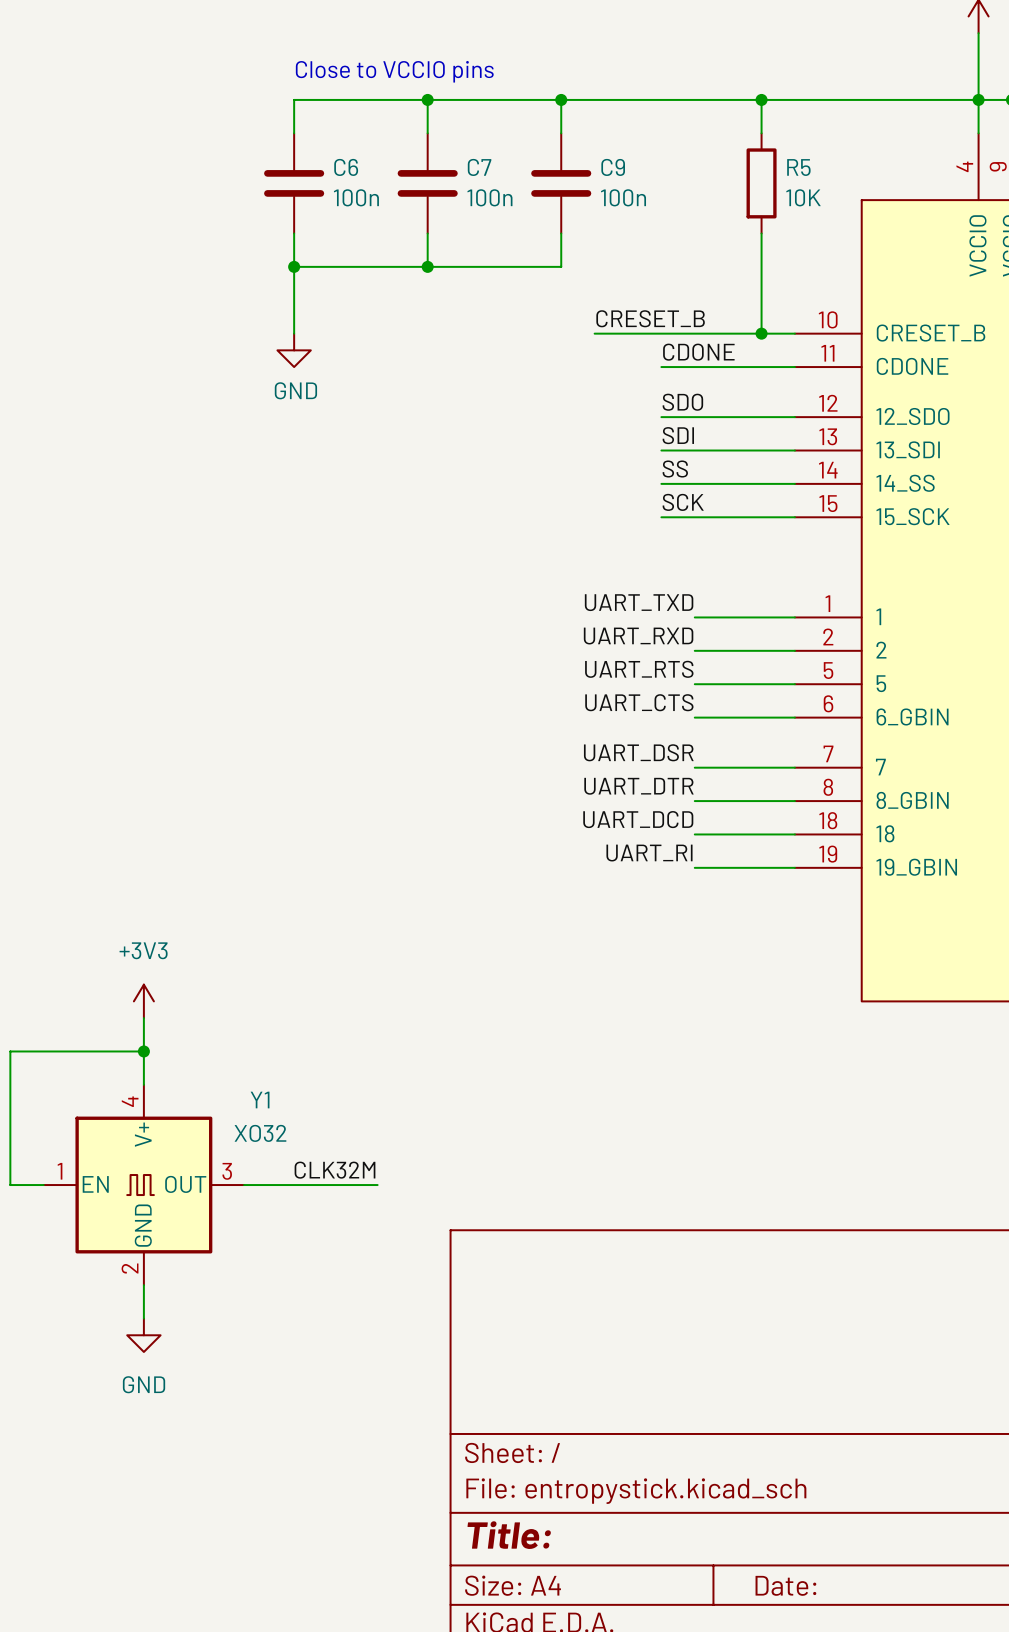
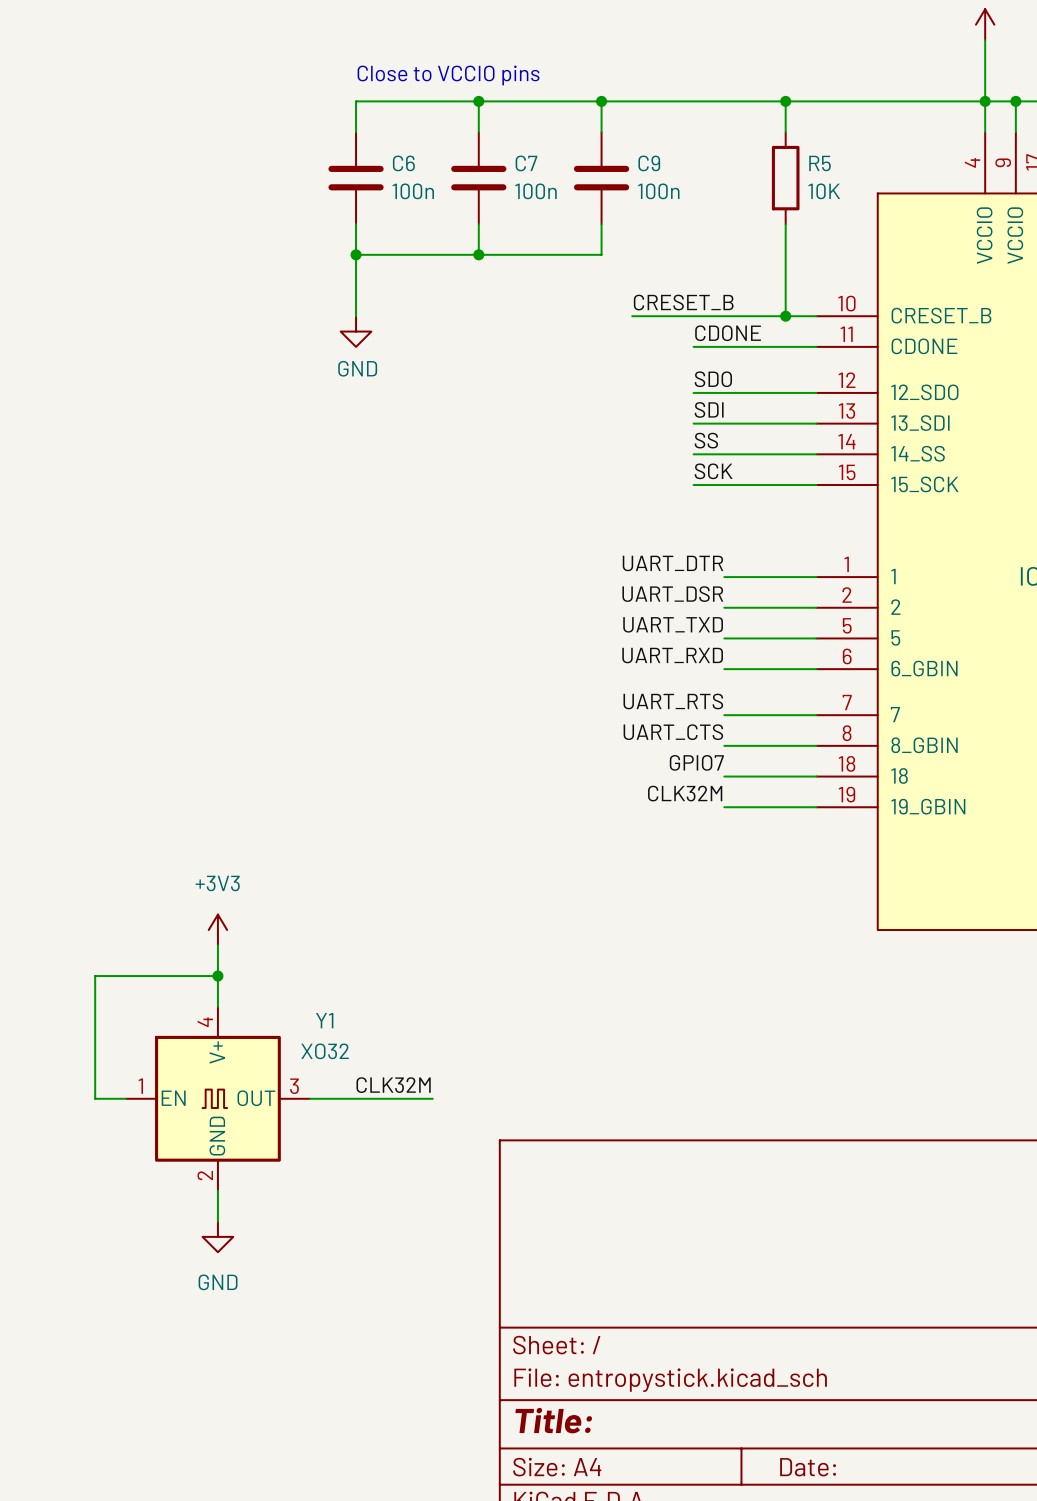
label: UART_TXD (639, 602) -> UART_DTR (672, 563)
label: UART_RXD (638, 636) -> UART_DSR (672, 594)
label: UART_RTS (639, 669) -> UART_TXD (673, 624)
label: UART_CTS (639, 702) -> UART_RXD (672, 655)
label: UART_DSR (638, 752) -> UART_RTS (673, 701)
label: UART_DTR (638, 786) -> UART_CTS (673, 732)
label: UART_DCD (638, 819) -> GPIO7 (696, 762)
label: UART_RI (649, 853) -> CLK32M (685, 793)

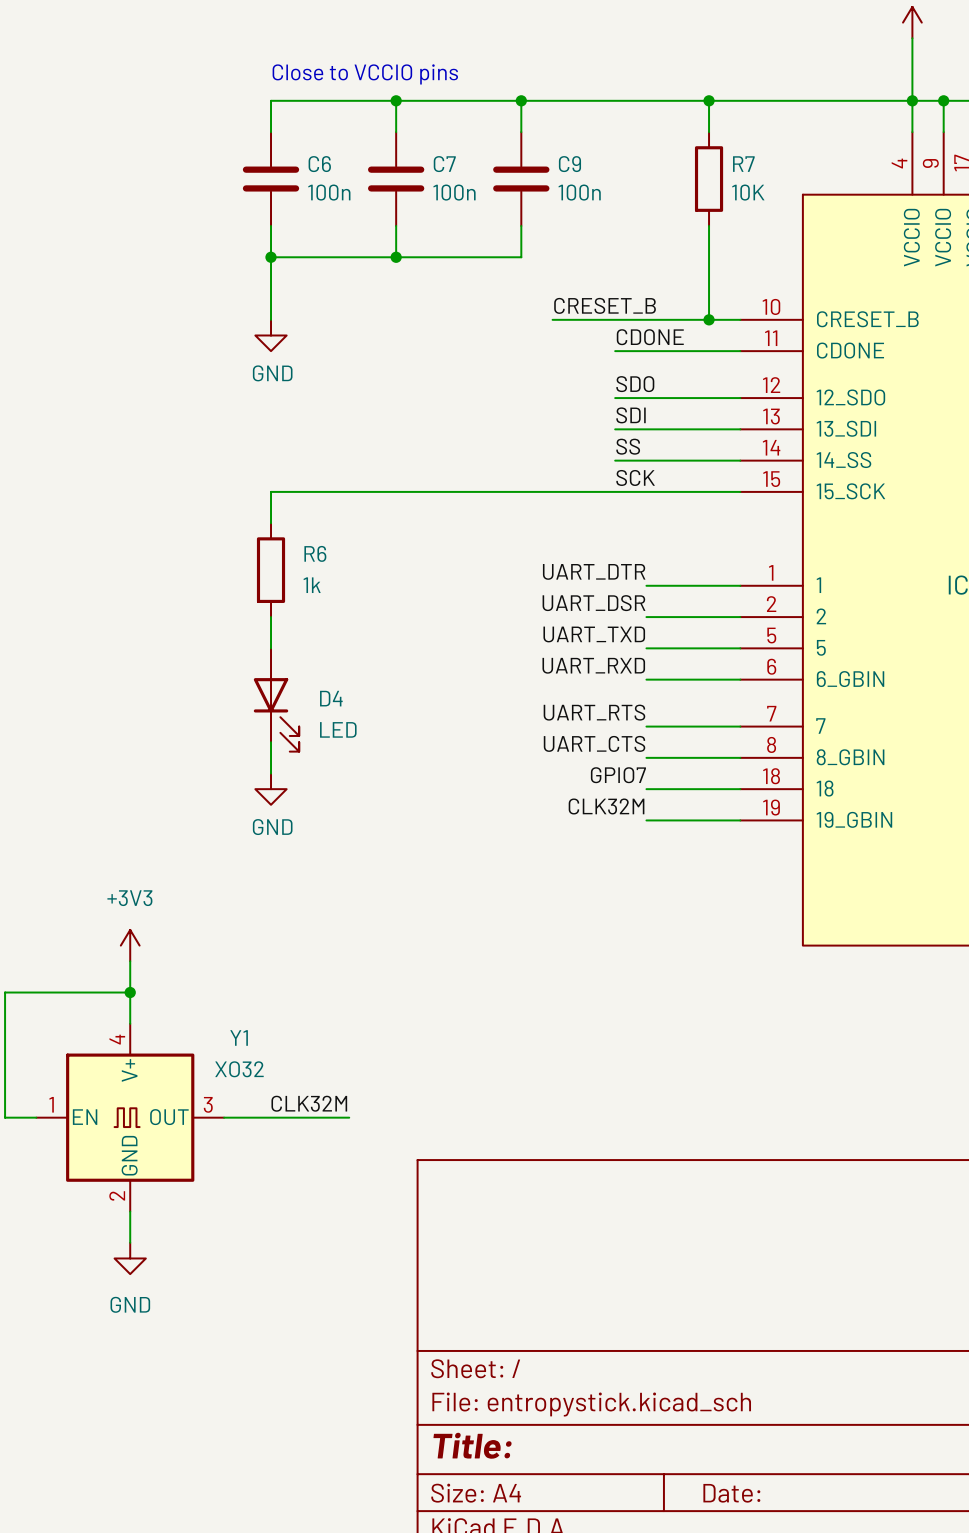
R5 name: R5 (820, 163) -> R7 (743, 164)
wire: none -> (615, 491) (271, 491) (271, 523)
R6: none -> 1k (271, 570)
wire: none -> (271, 617) (271, 648)
D4: none -> LED (276, 699)
wire: none -> (271, 742) (271, 773)
power symbol: none -> GND (271, 789)

